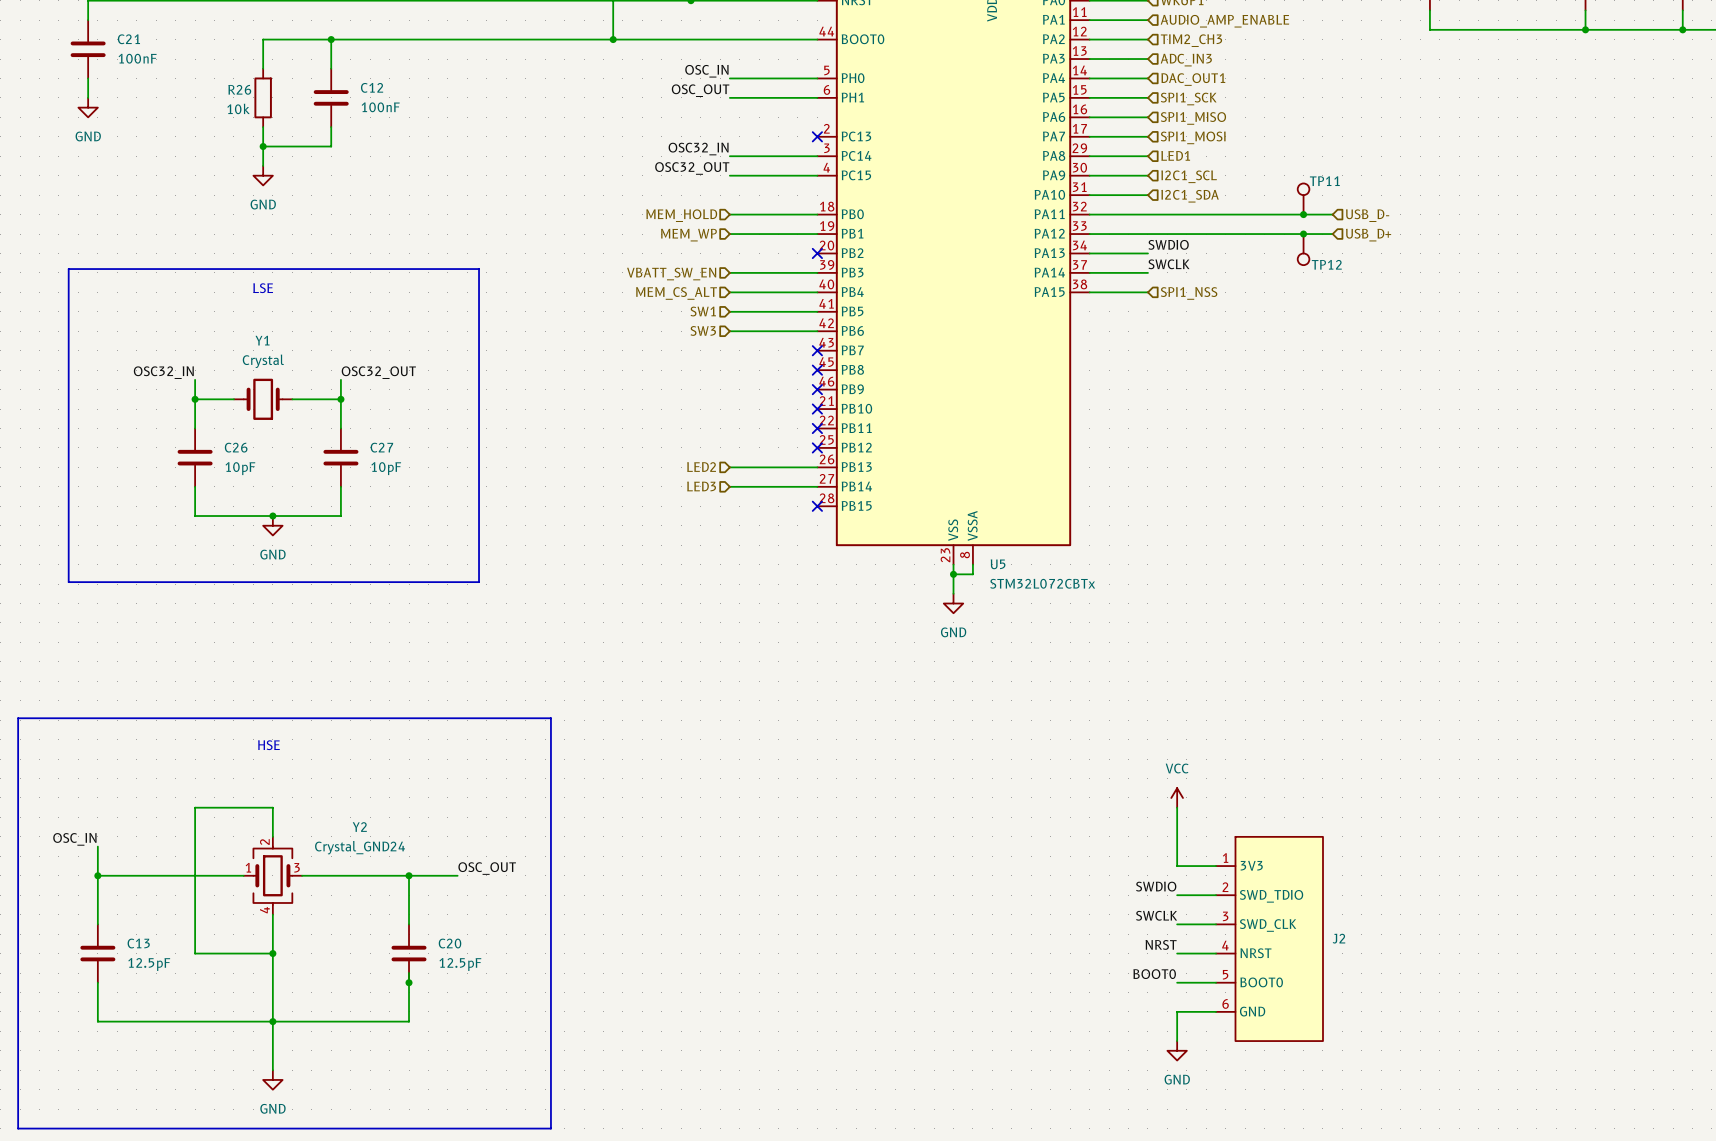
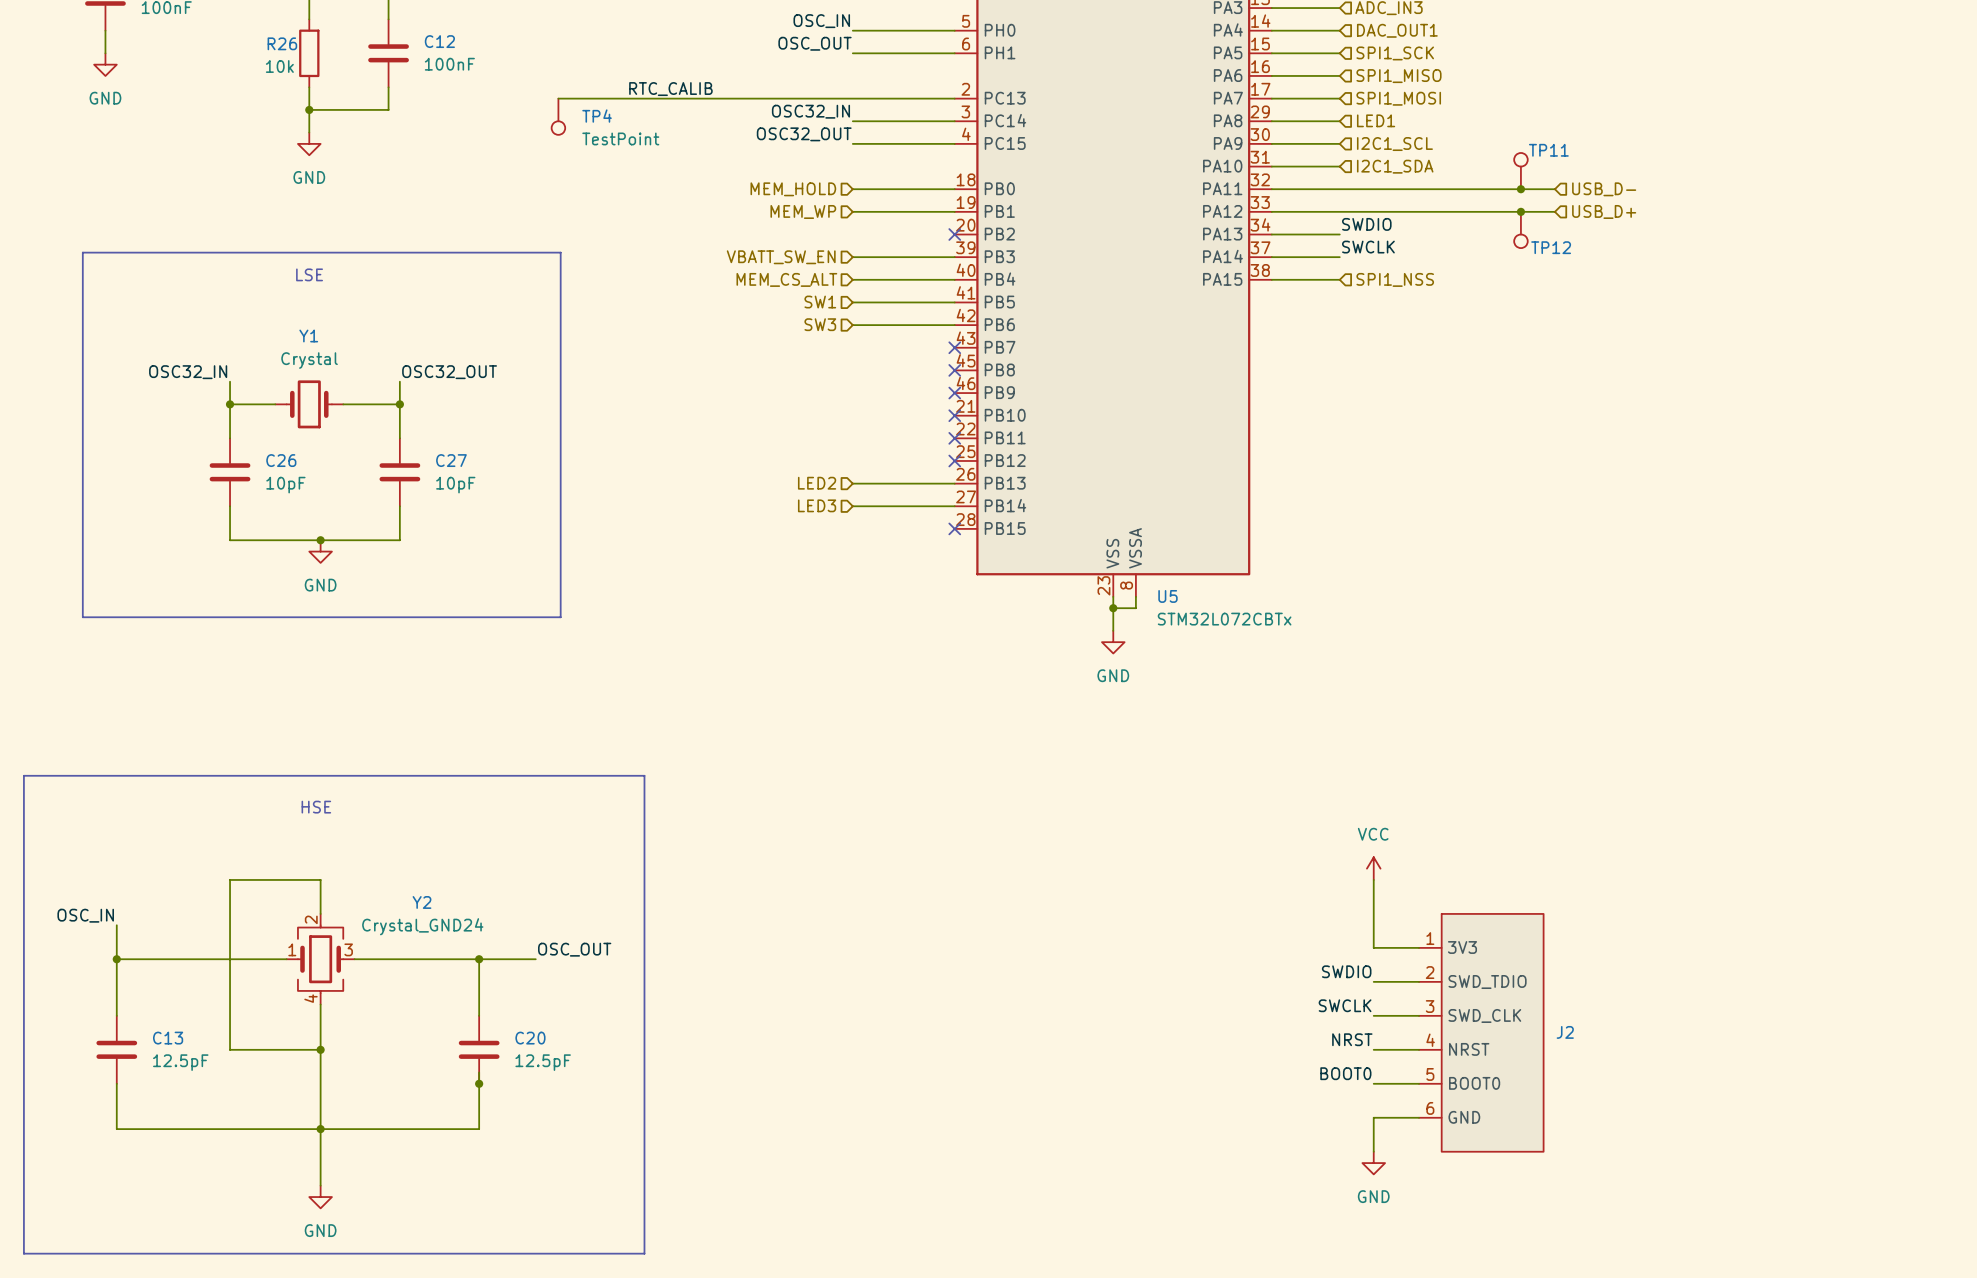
label: none -> RTC_CALIB (670, 89)
wire: none -> (558, 98) (954, 98)
no-connect mark: (817, 136) -> none
TP4: none -> TestPoint (558, 116)

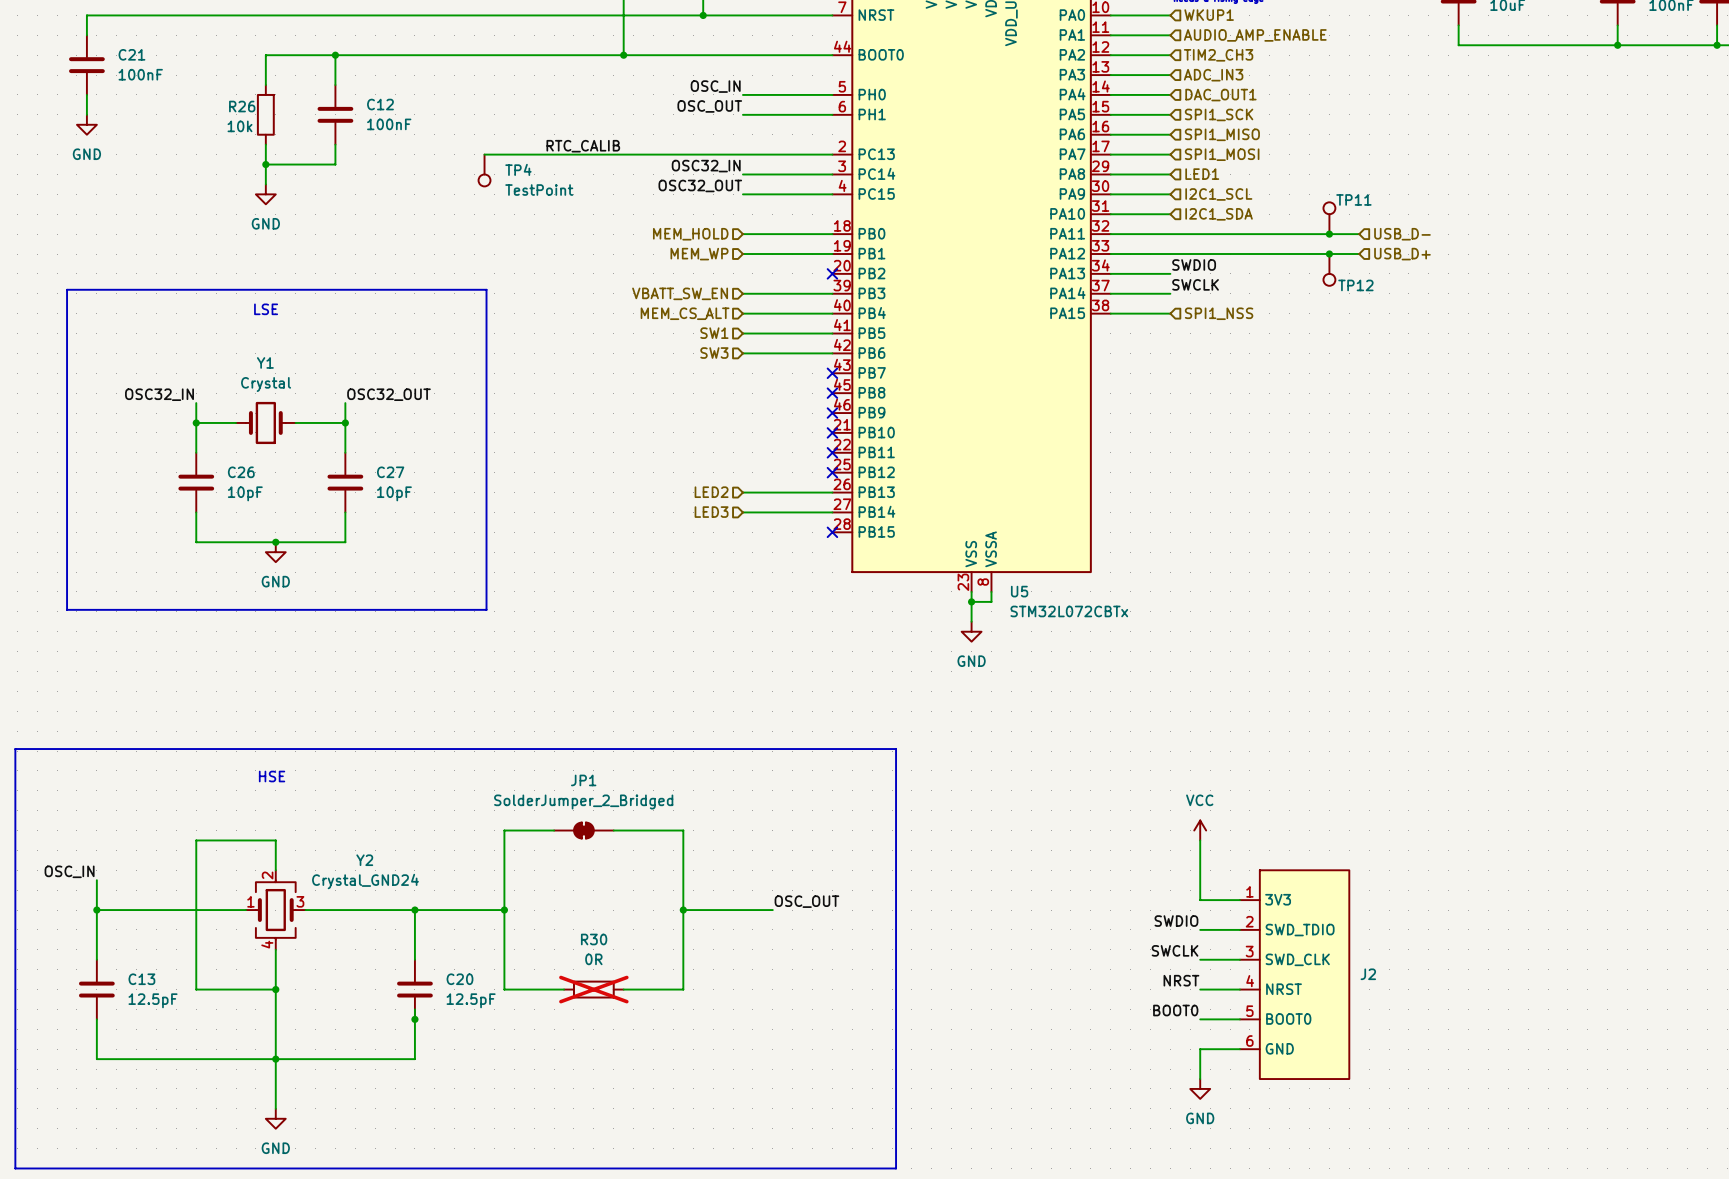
line: (644, 775) (644, 1253) -> (560, 749) (896, 749) (896, 1168) (560, 1168)
wire: none -> (554, 830) (504, 830) (504, 989) (564, 989)
JP1: none -> SolderJumper_2_Bridged (583, 830)
wire: none -> (613, 830) (683, 830) (683, 989) (623, 989)
label: OSC_OUT (574, 949) -> none
label: none -> OSC_OUT (806, 901)
wire: none -> (464, 910) (504, 910)
junction: none -> (504, 910)
wire: none -> (683, 910) (772, 910)
junction: none -> (683, 910)
R30: none -> 0R (593, 989)

